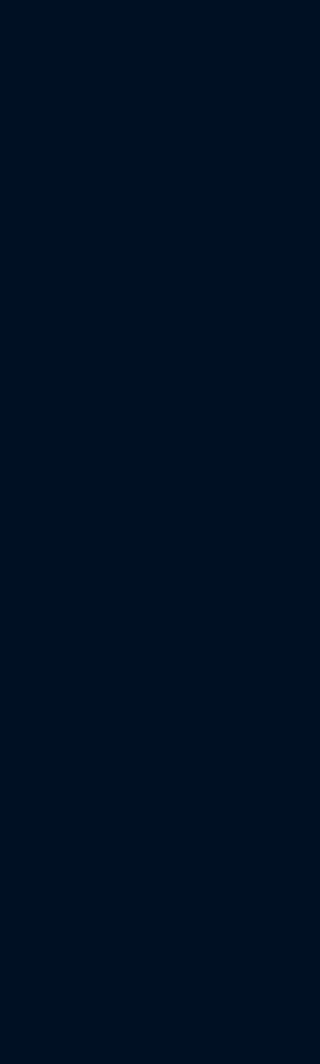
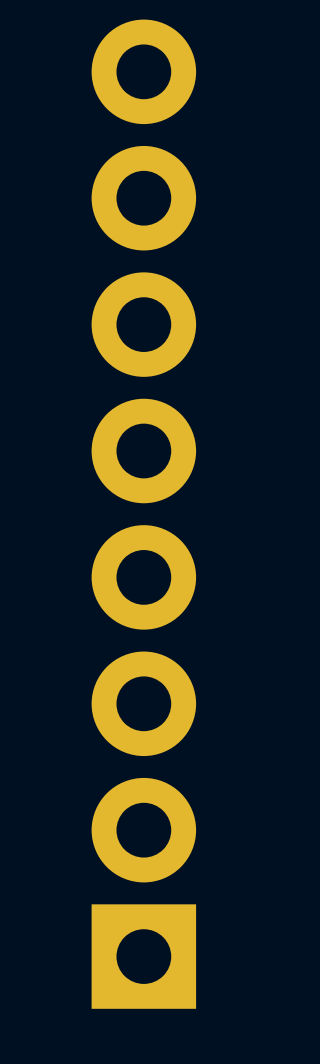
part: none -> (143, 514)

